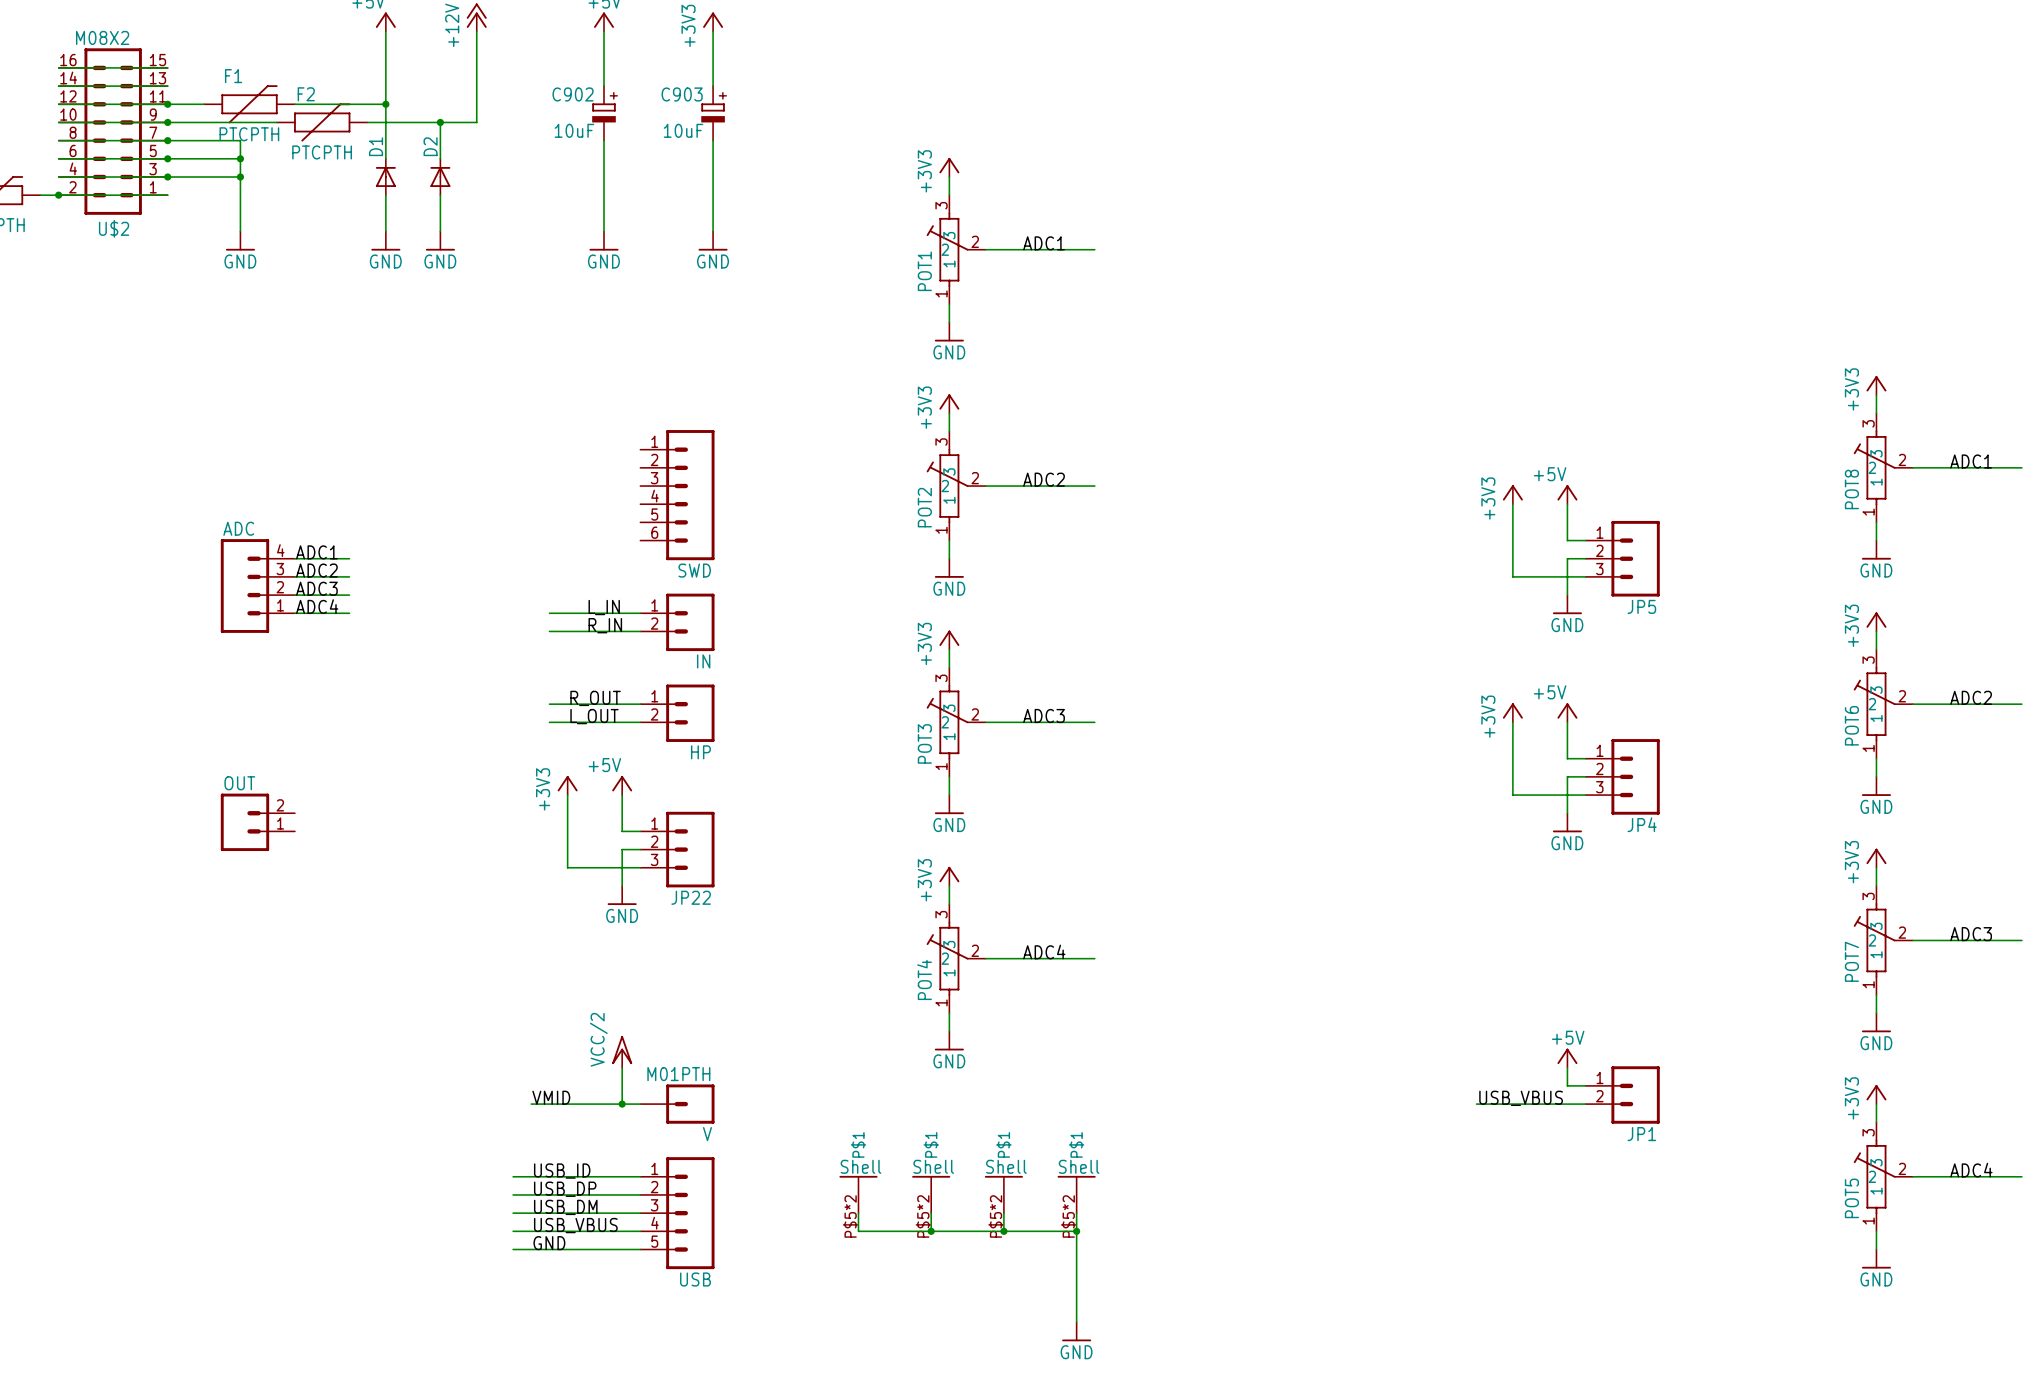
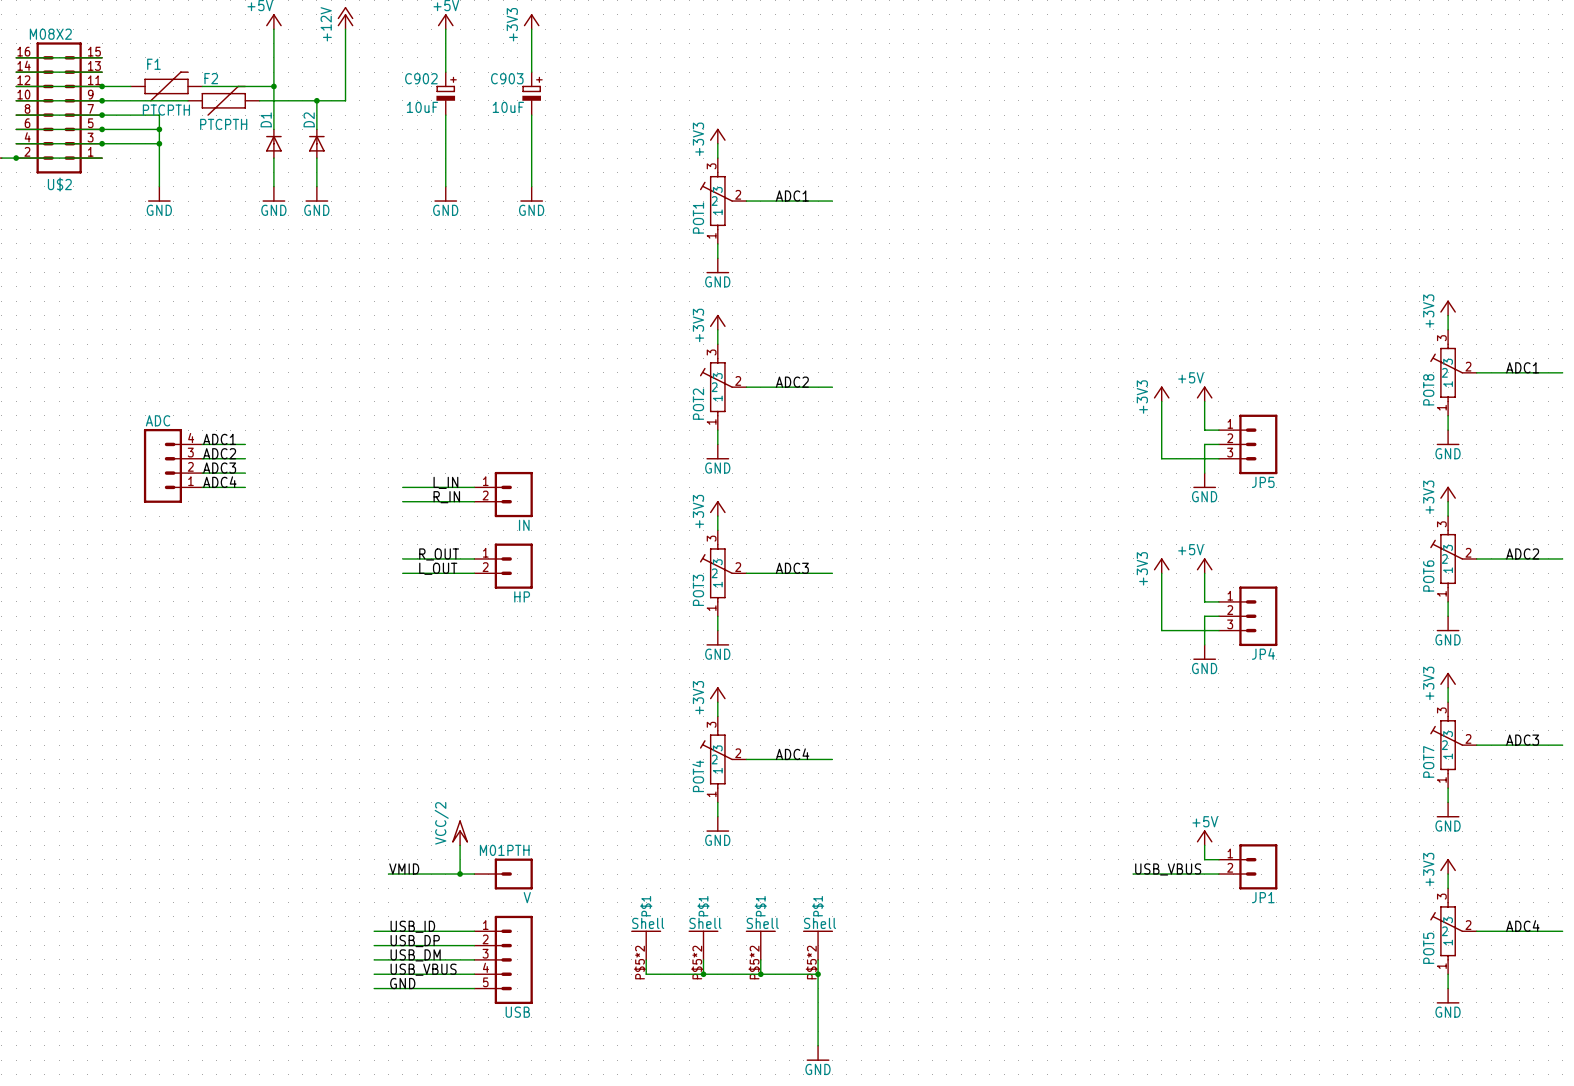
SWD: (677, 495) -> none
power symbol: +3V3 (567, 785) -> none
power symbol: +5V (622, 785) -> none
wire: (567, 795) (567, 867) (640, 867) -> none
wire: (622, 795) (622, 831) (640, 831) -> none
OUT: (257, 822) -> none
wire: (640, 849) (622, 849) (622, 885) -> none
JP22: (677, 849) -> none
power symbol: GND (622, 895) -> none

